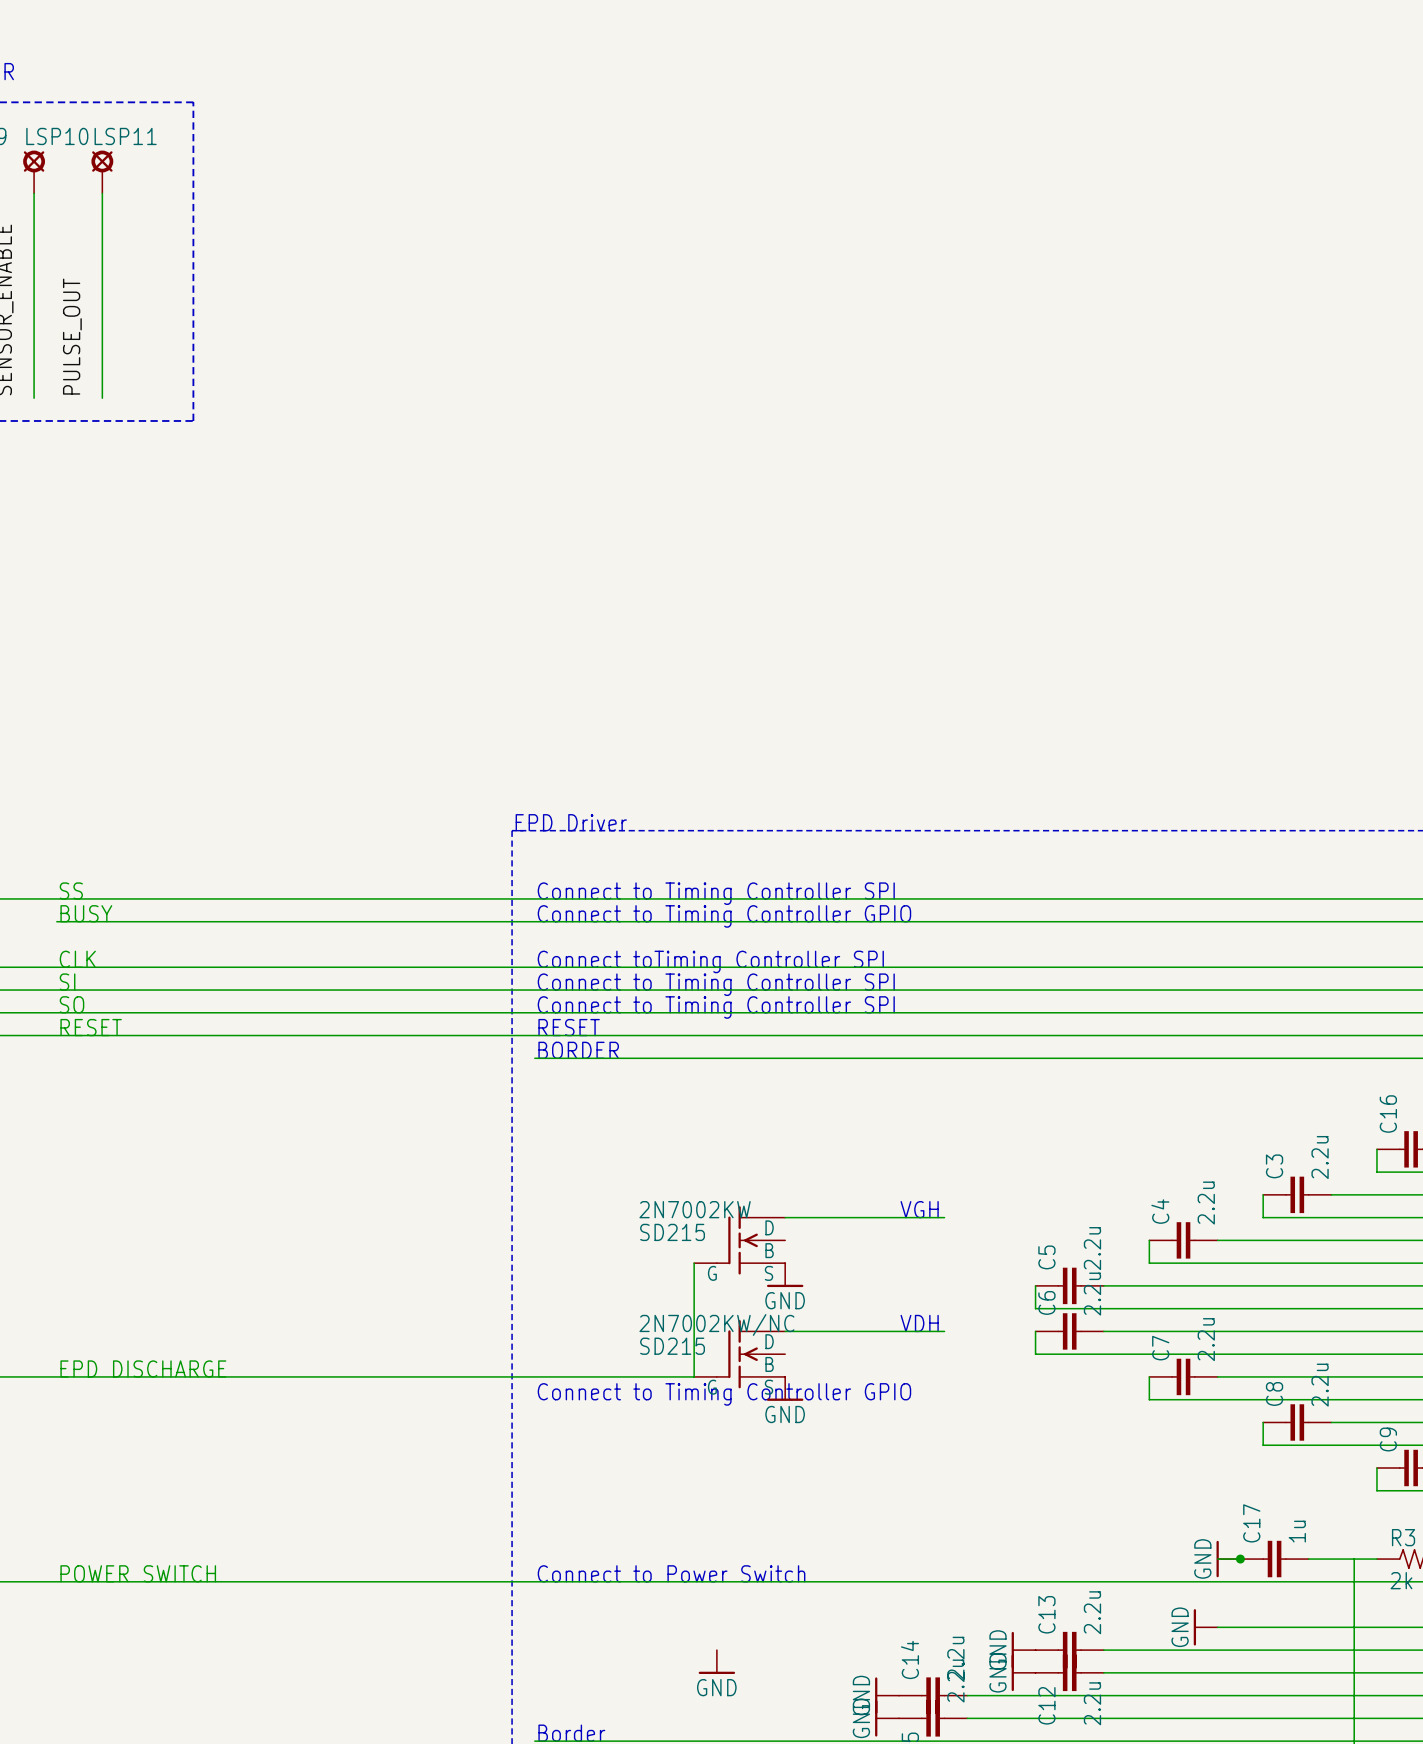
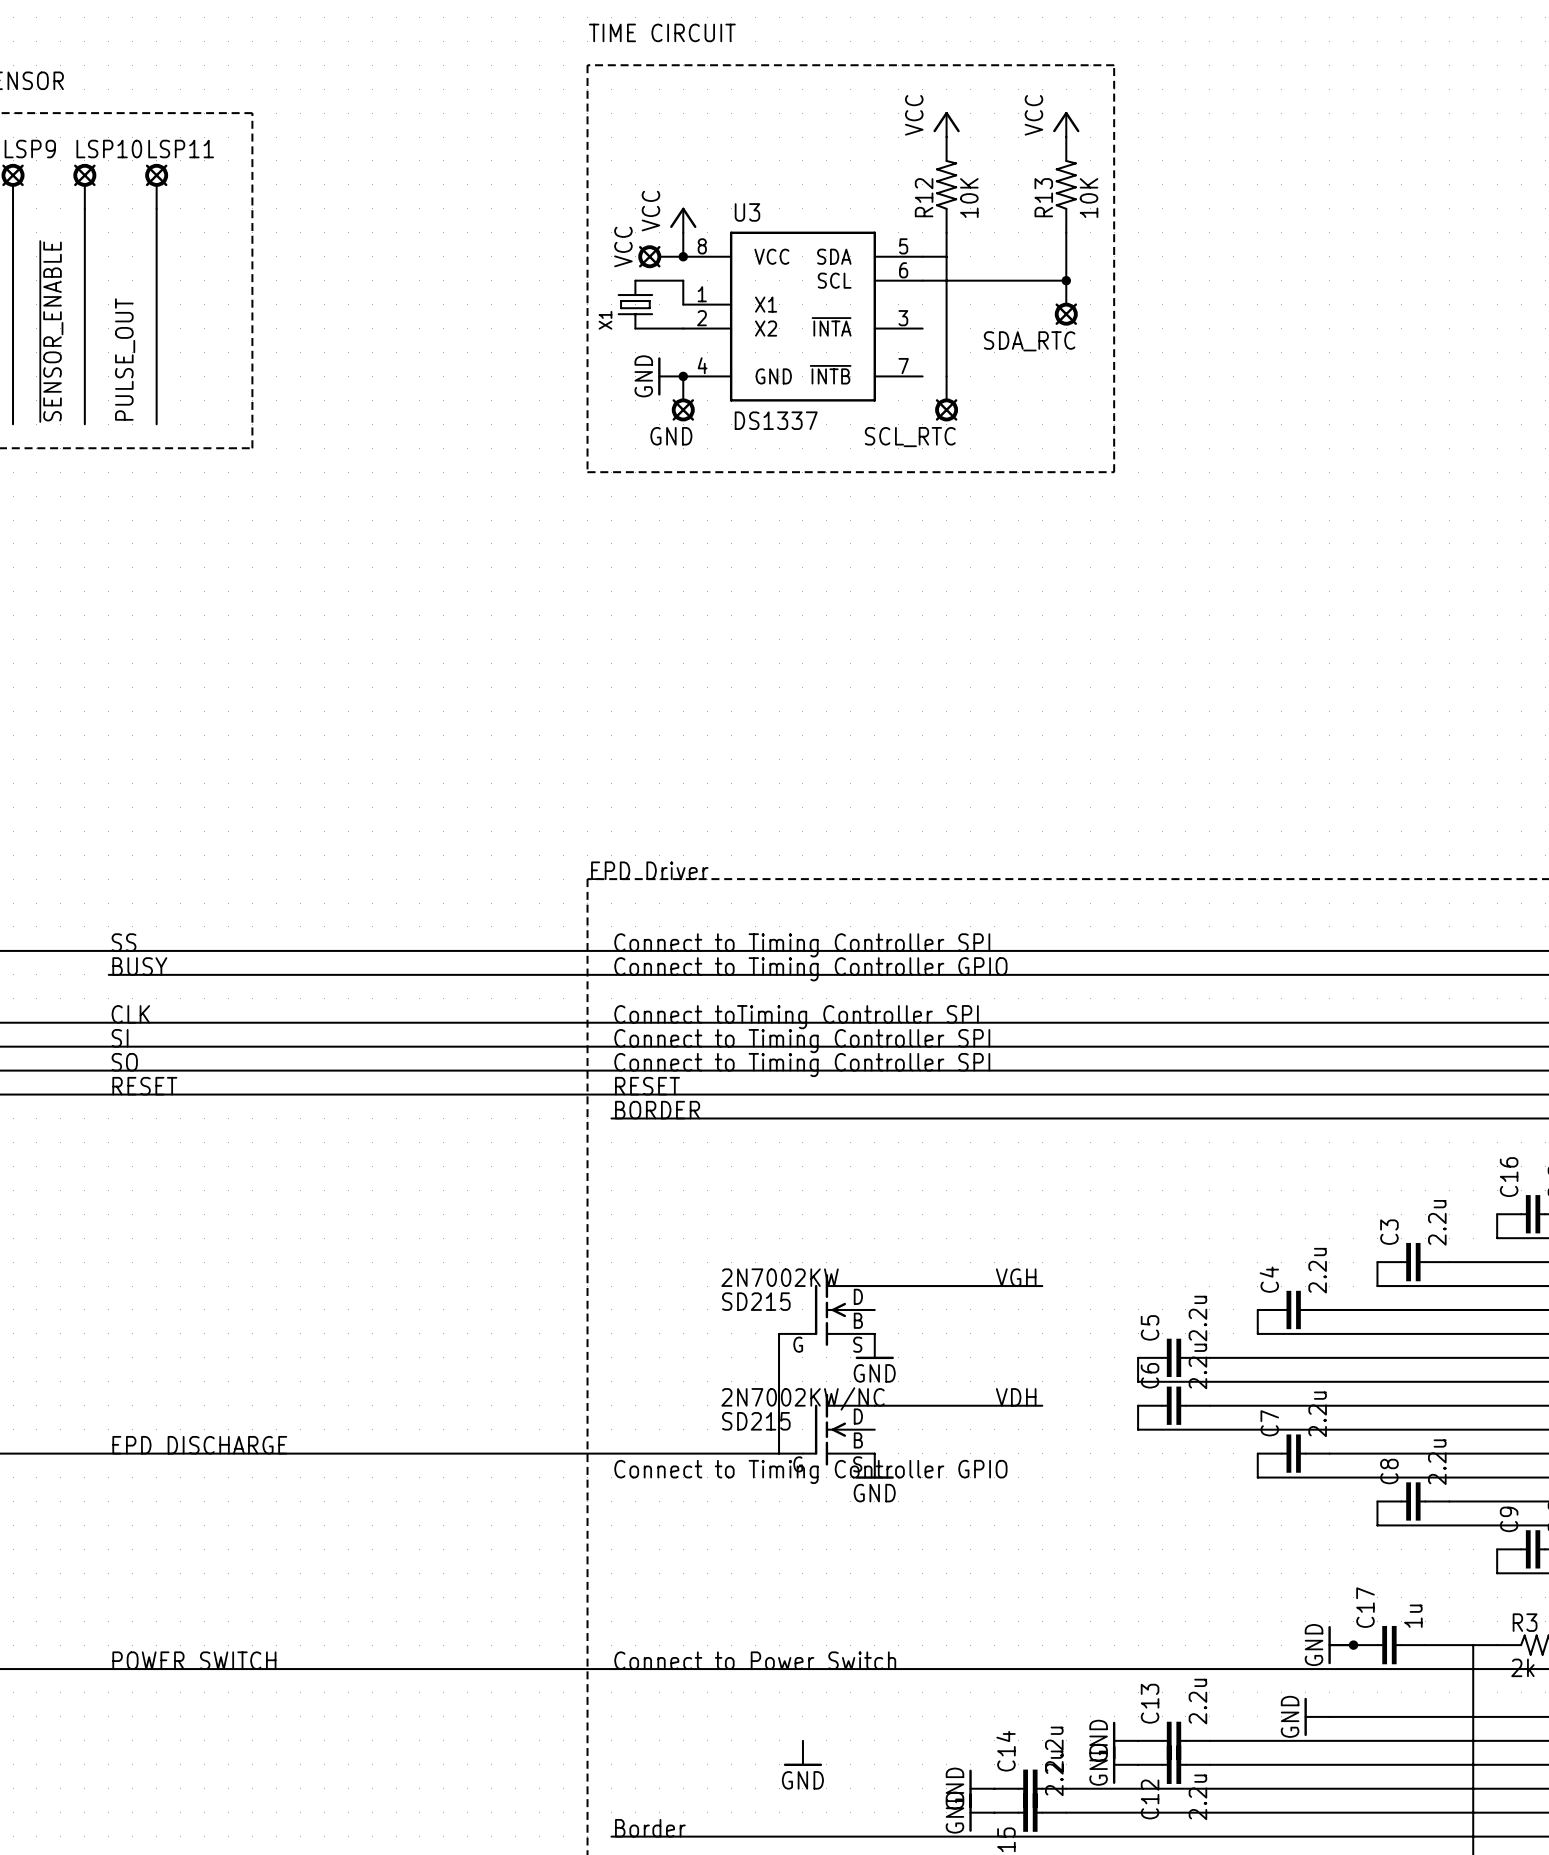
text: none -> TIME CIRCUIT (662, 32)
line: none -> (587, 65) (1114, 65) (1114, 472) (587, 472) (587, 65)
power symbol: none -> VCC (946, 124)
power symbol: none -> VCC (1066, 124)
R12: none -> 10K (946, 184)
R13: none -> 10K (1066, 184)
power symbol: none -> VCC (683, 220)
wire: none -> (683, 232) (683, 256)
wire: none -> (946, 232) (946, 376)
wire: none -> (1066, 232) (1066, 280) (922, 280)
VCC: none -> (660, 256)
junction: none -> (683, 256)
wire: none -> (922, 256) (946, 256)
wire: none -> (635, 280) (683, 280) (683, 304)
junction: none -> (1066, 280)
SDA_RTC: none -> (1066, 303)
X1: none -> (635, 304)
U3: none -> DS1337 (802, 316)
wire: none -> (635, 328) (683, 328)
power symbol: none -> GND (670, 376)
junction: none -> (683, 376)
GND: none -> (683, 398)
SCL_RTC: none -> (946, 398)

